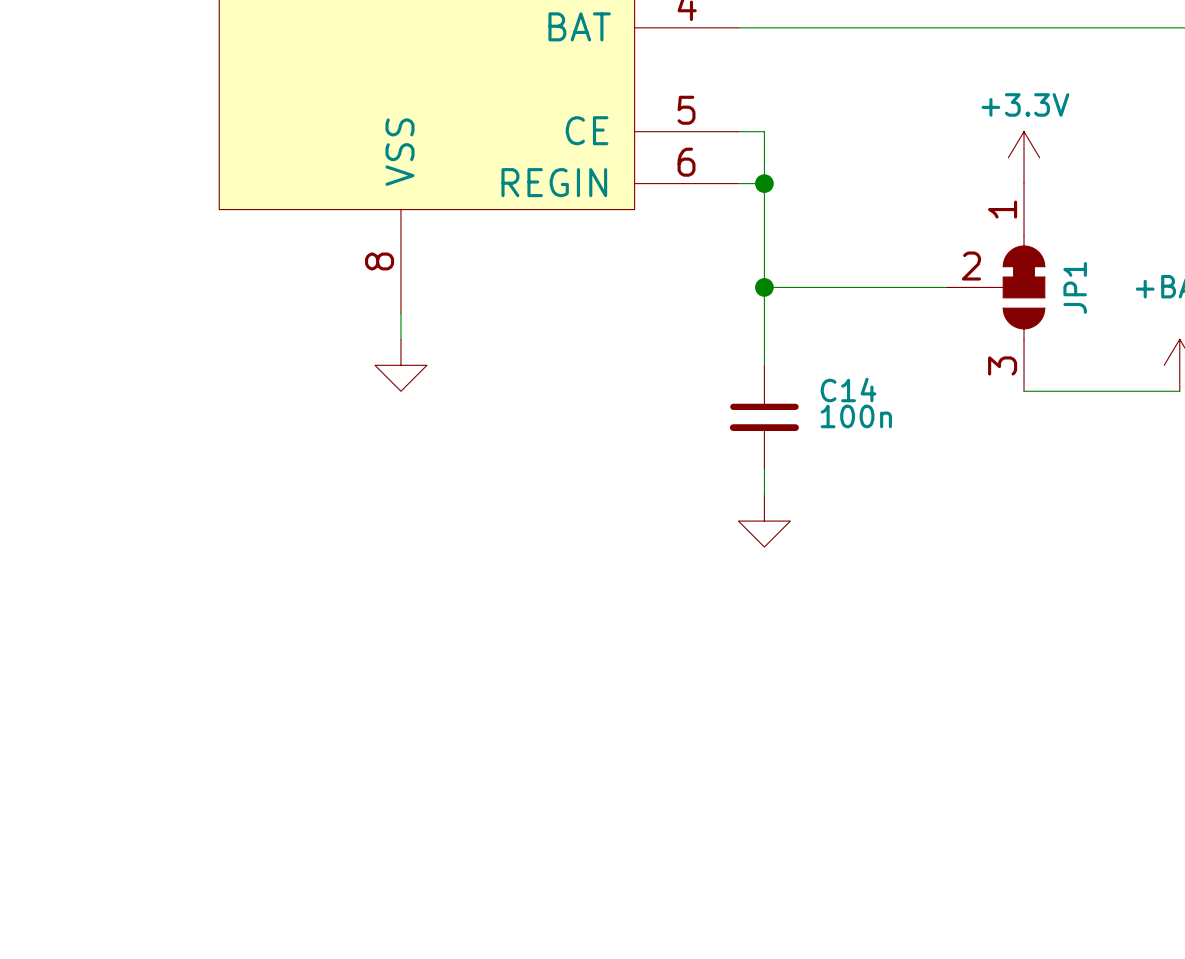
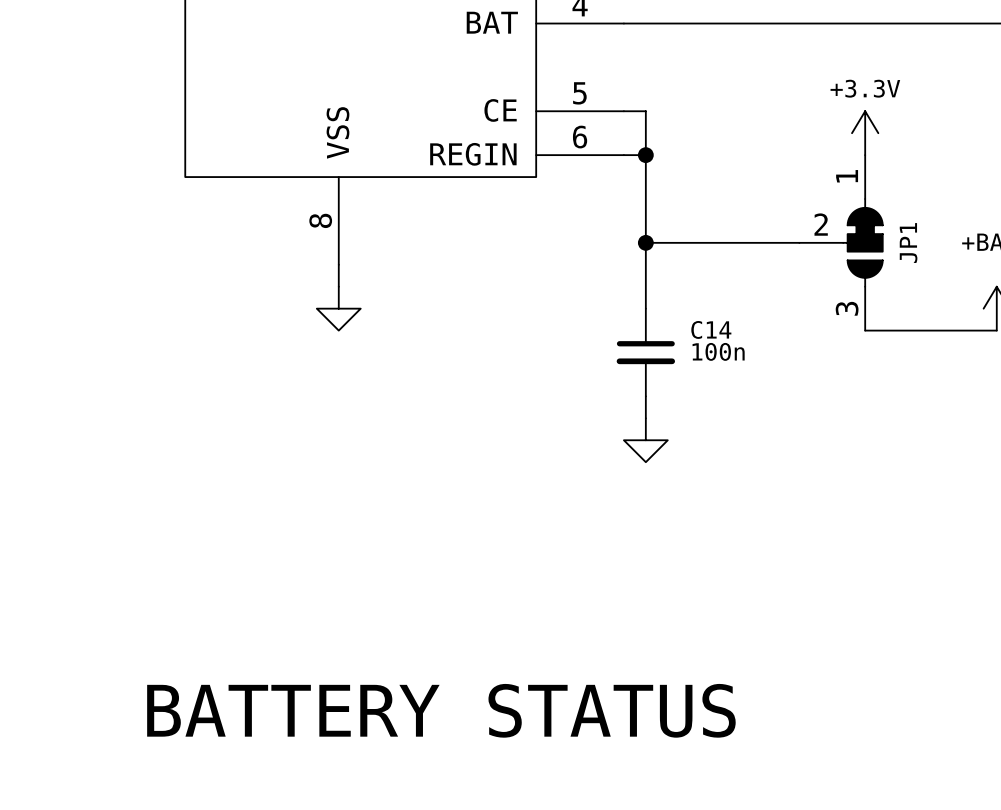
text: none -> BATTERY STATUS (441, 710)

